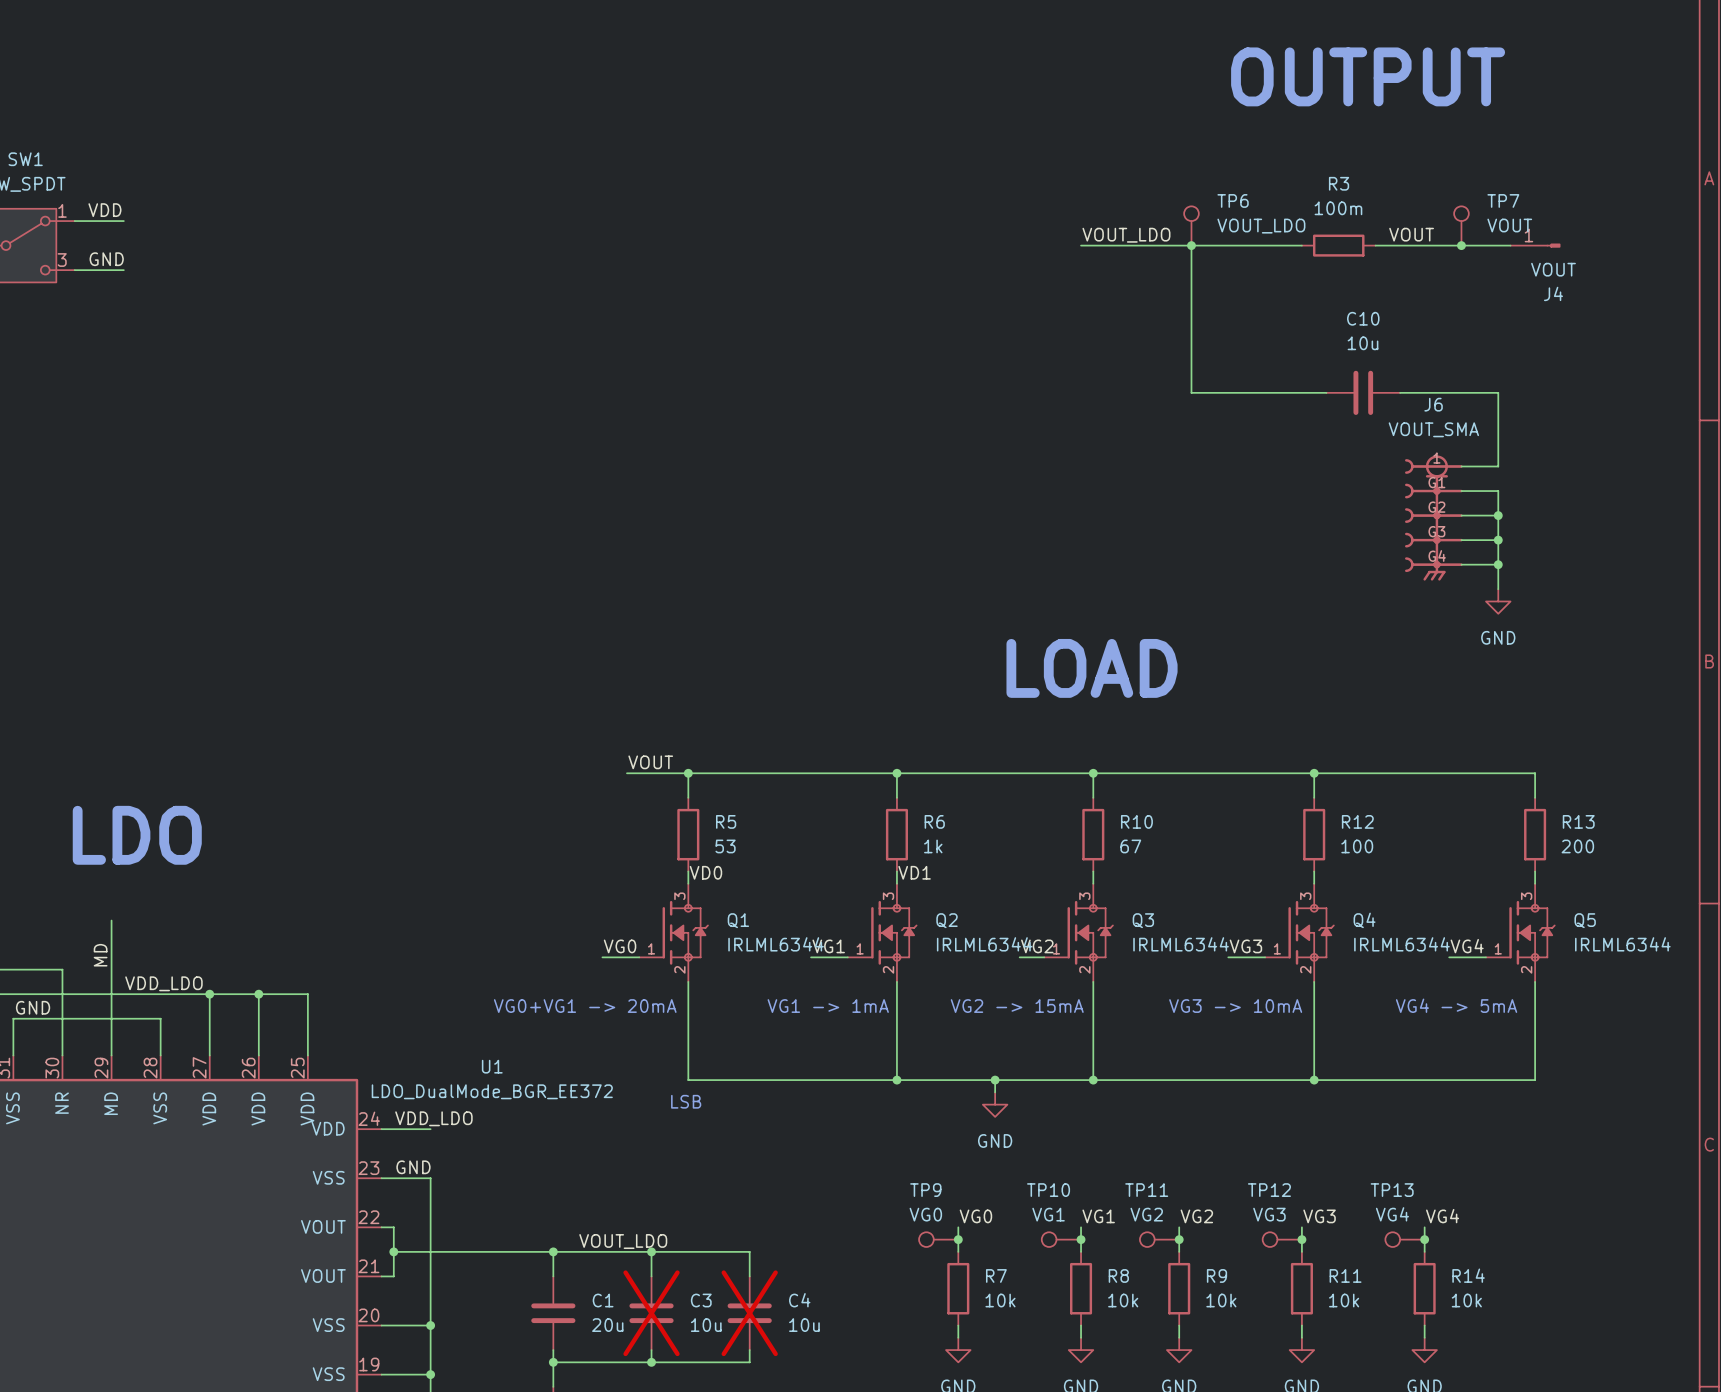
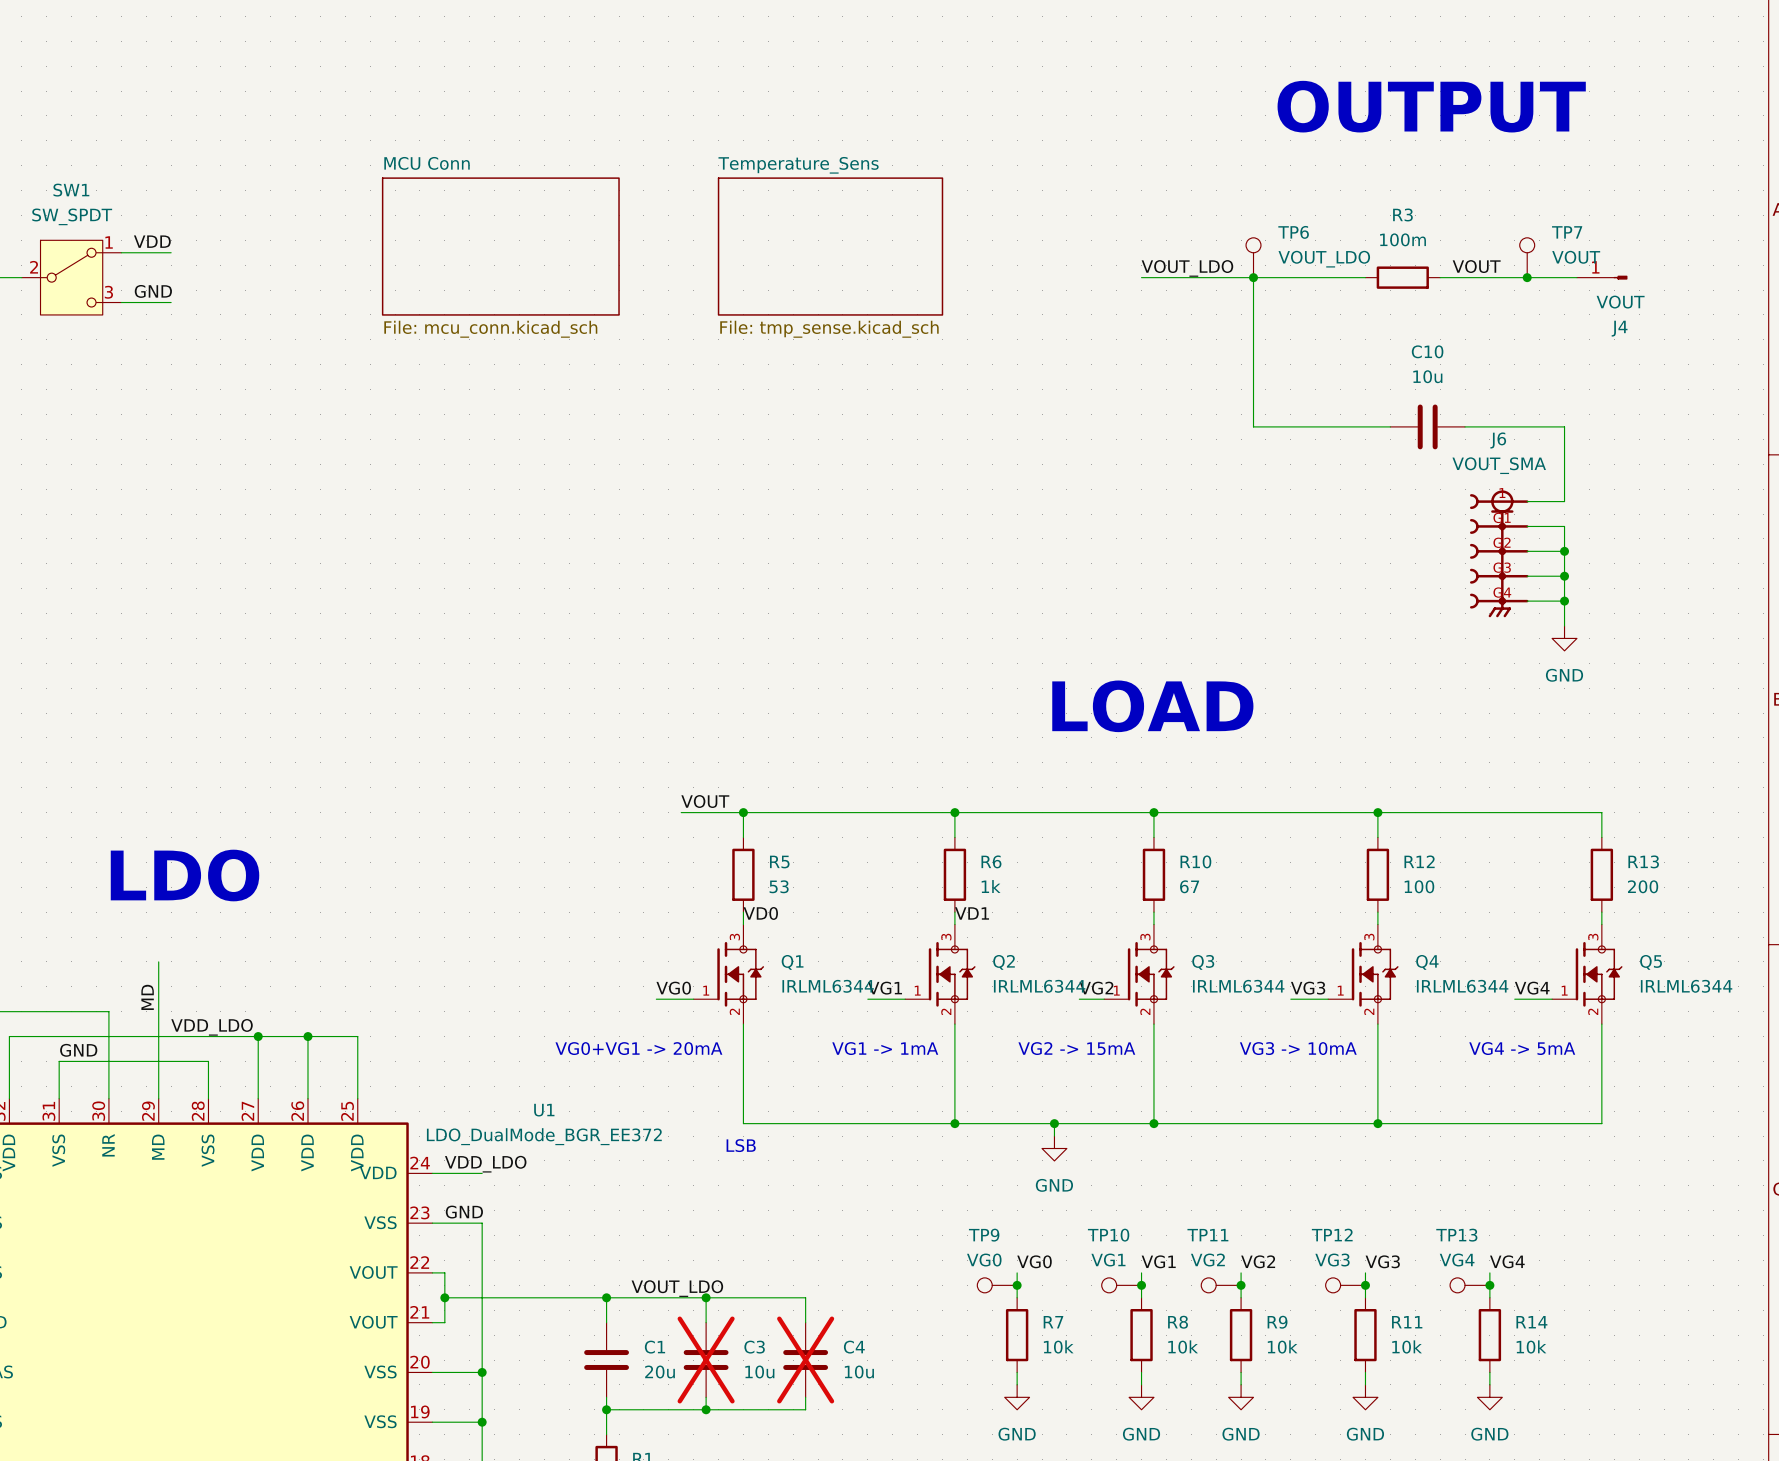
sheet MCU Conn: none -> File: mcu_conn.kicad_sch (500, 246)
sheet Temperature_Sens: none -> File: tmp_sense.kicad_sch (830, 246)

